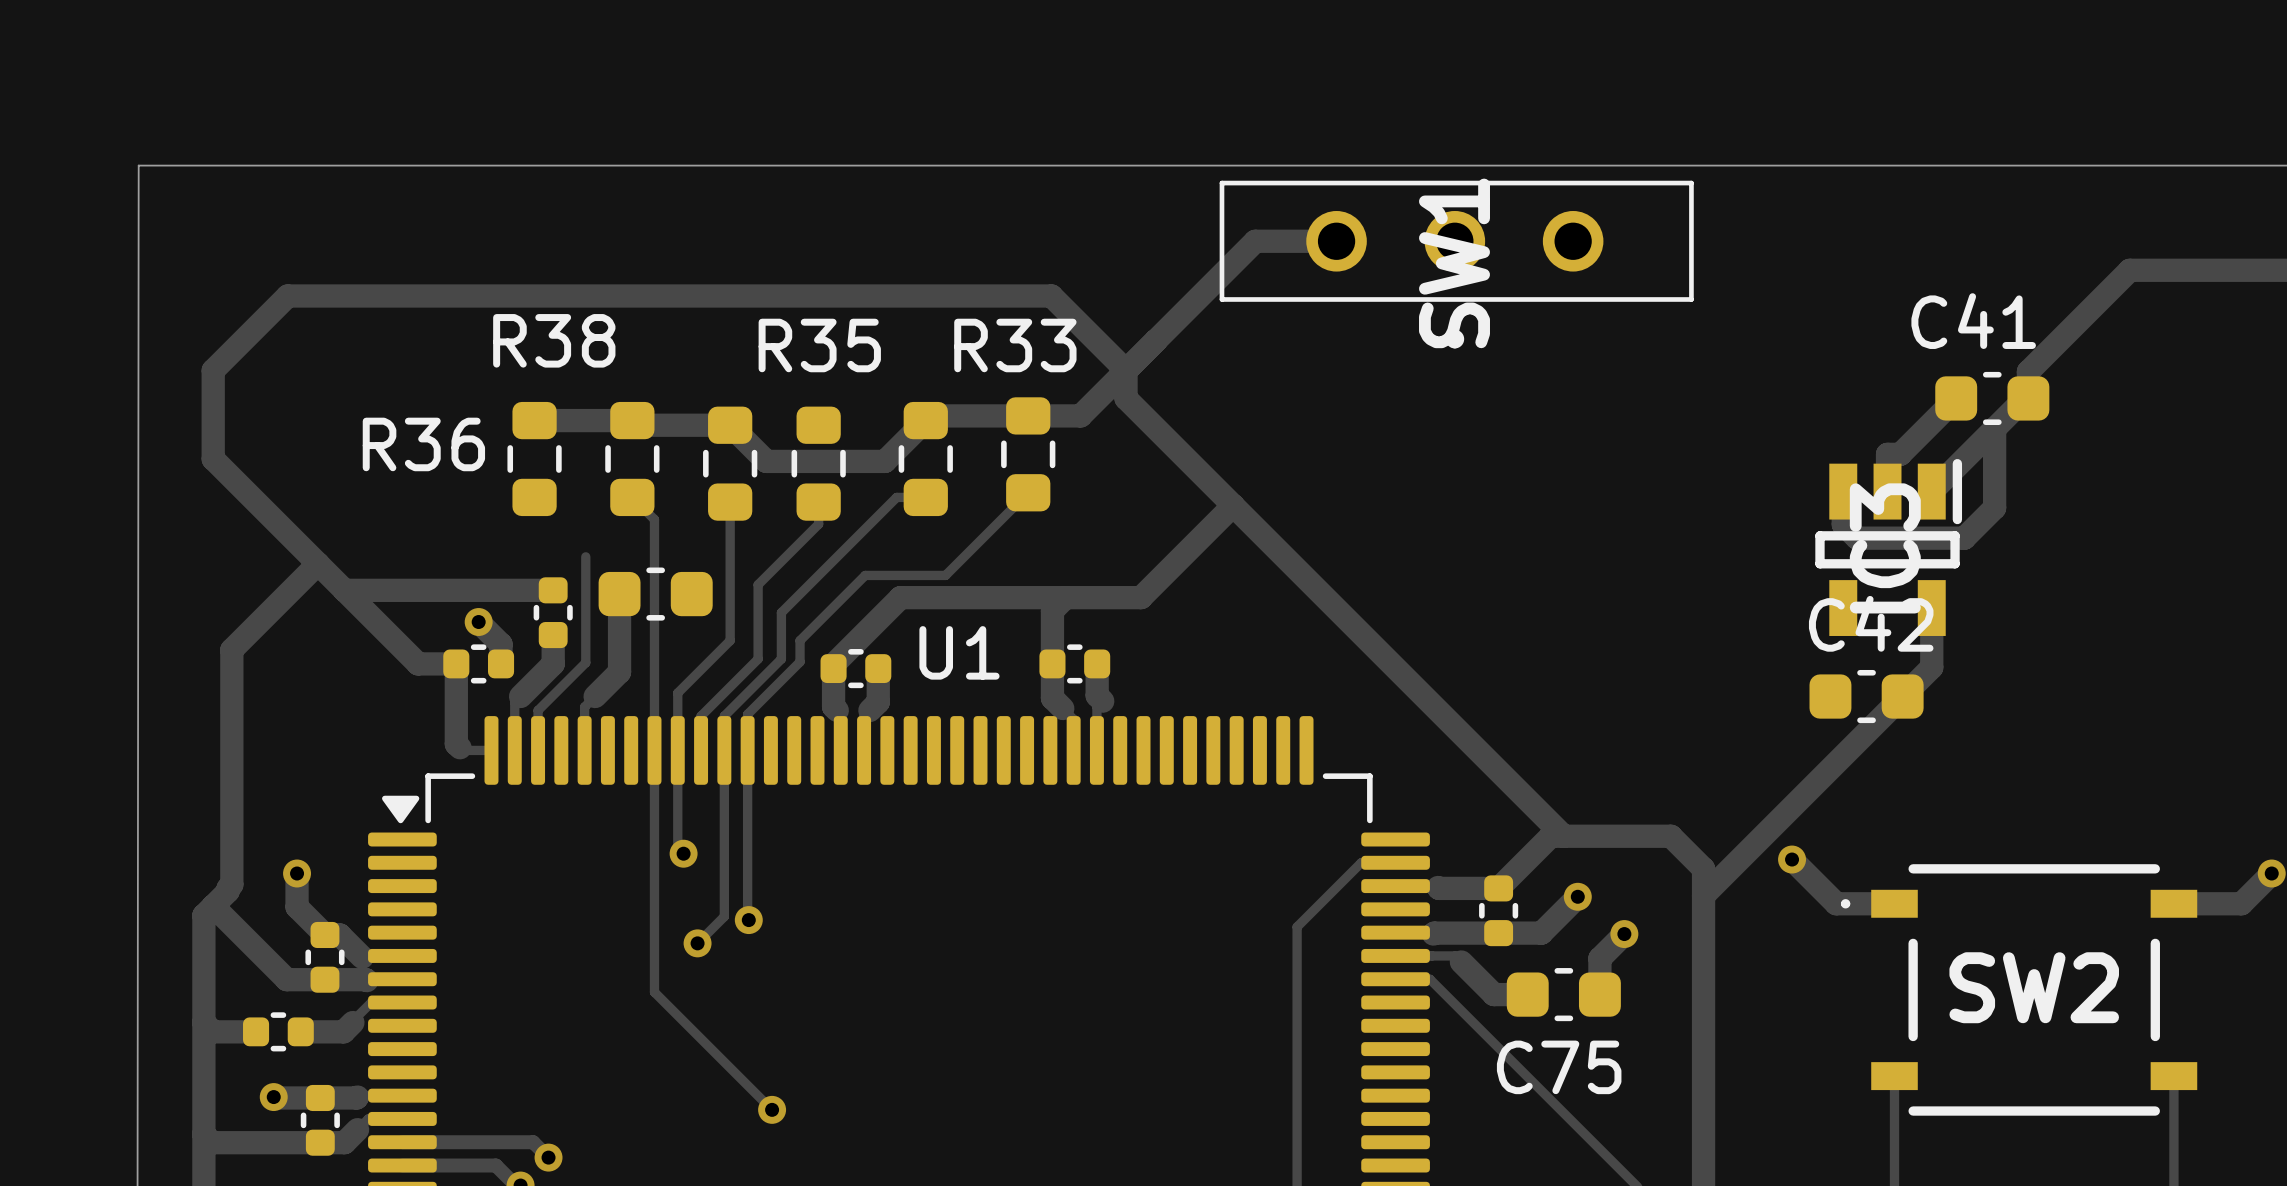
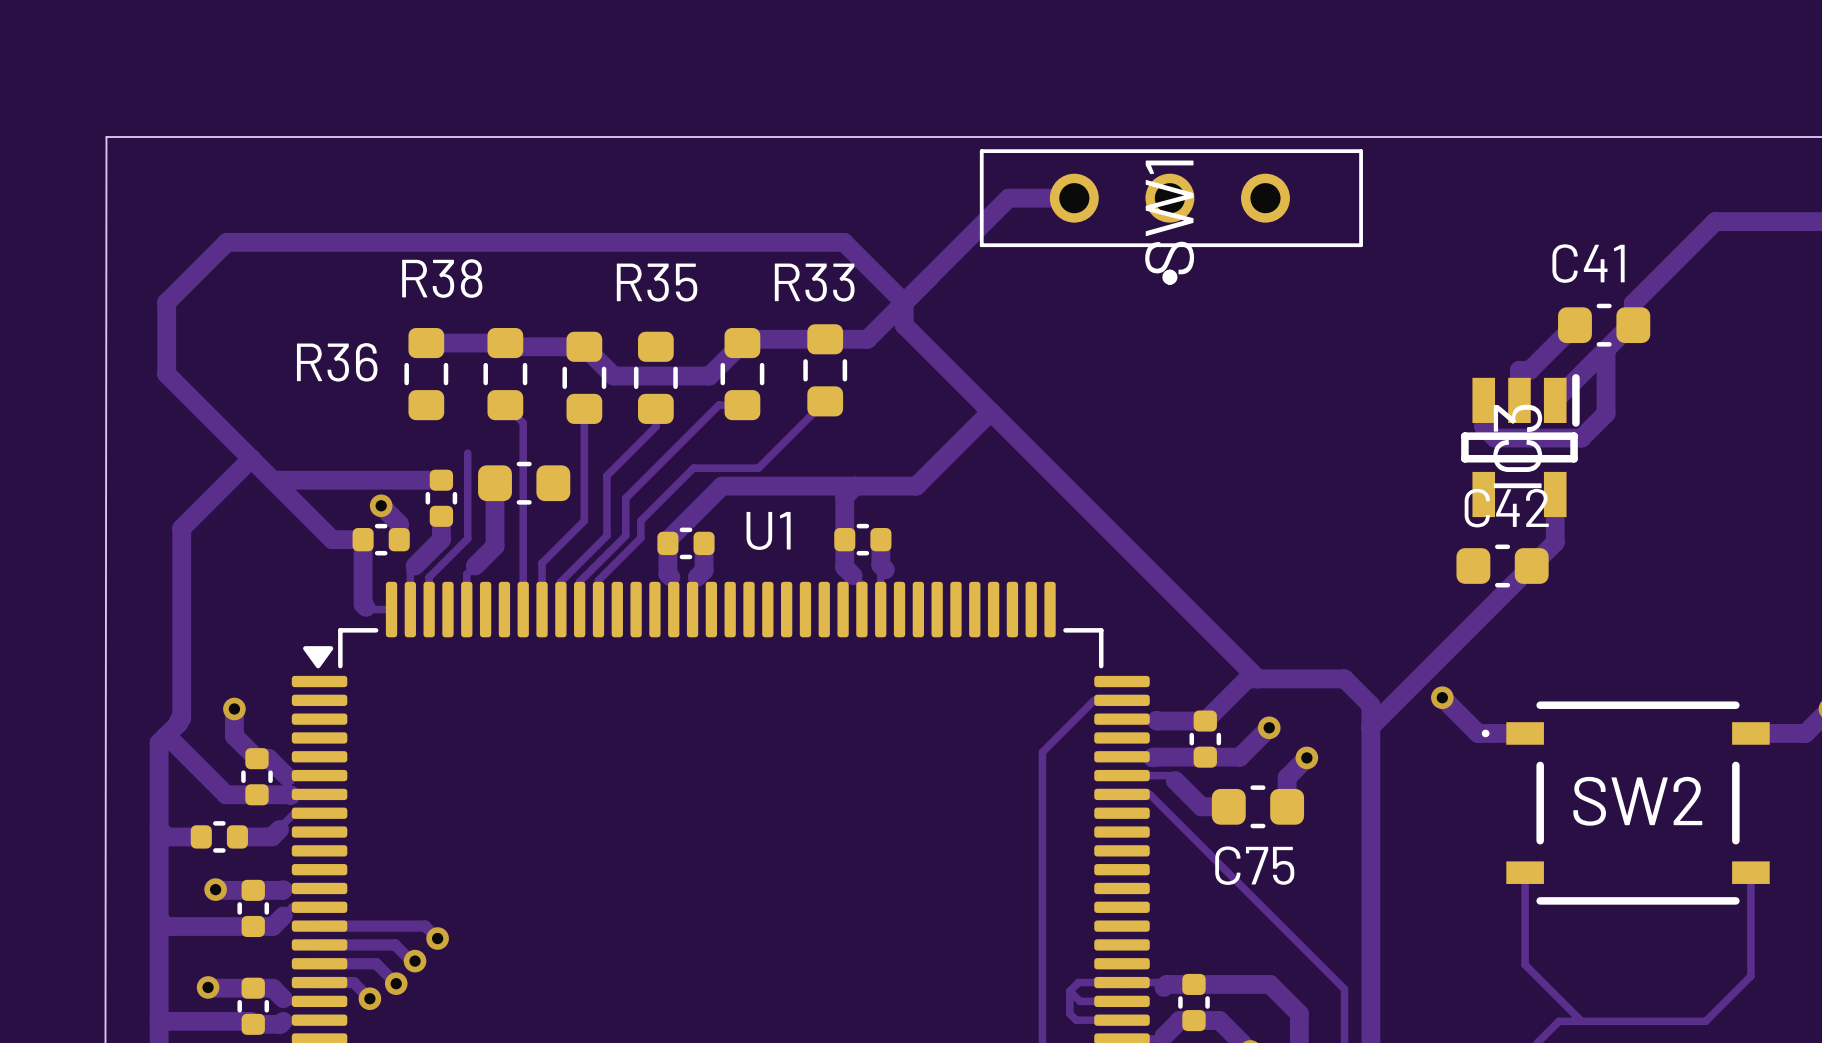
track: (654, 750) (654, 992) (772, 1109) -> none
track: (677, 750) (677, 847) (683, 853) -> none
track: (724, 750) (724, 916) (697, 943) -> none
track: (747, 750) (748, 920) -> none
via: (683, 853) -> none
via: (748, 920) -> none
via: (697, 943) -> none
via: (772, 1109) -> none

